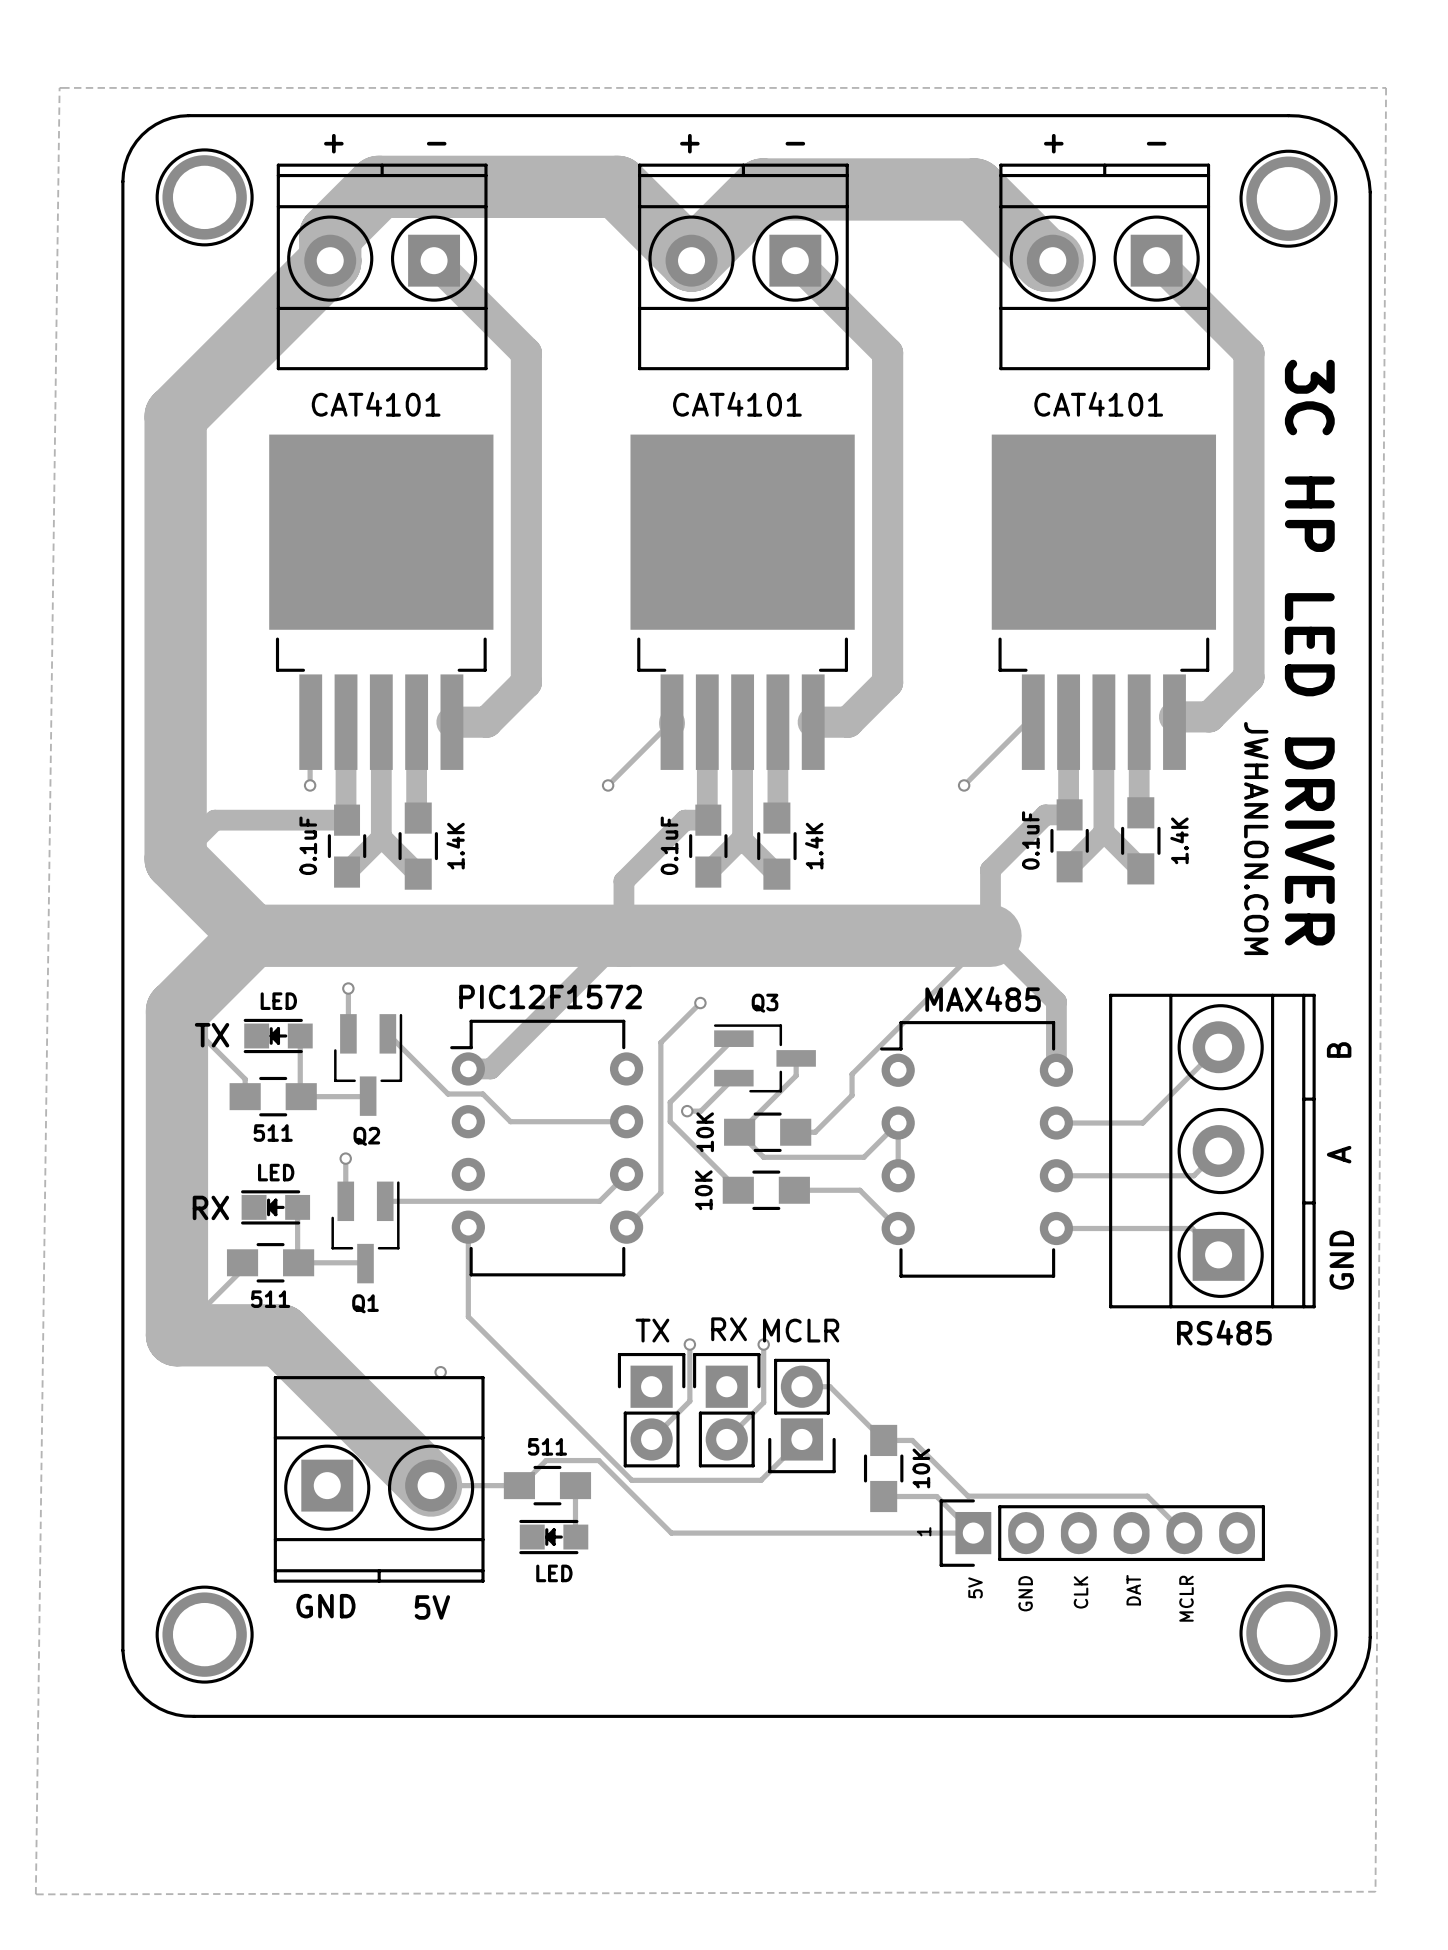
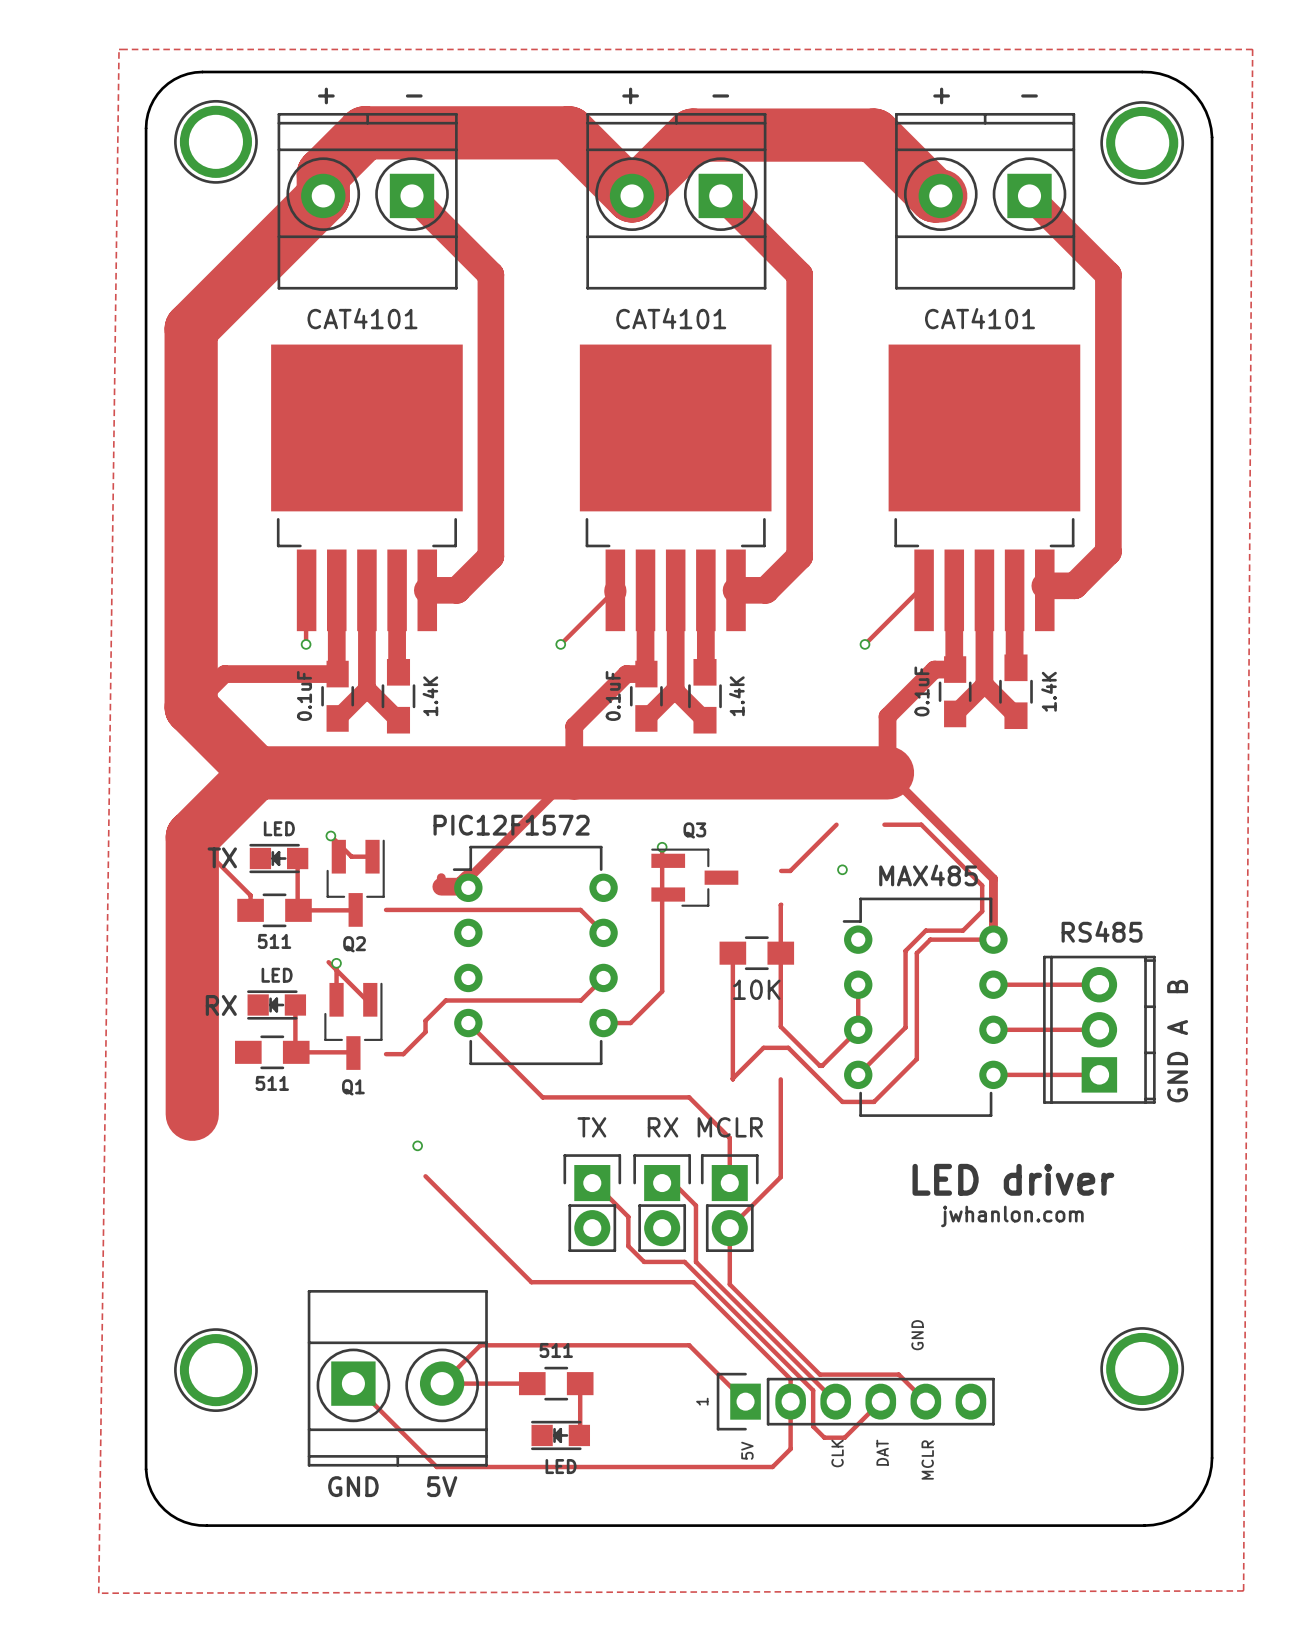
zone outline: (59, 87) (1386, 87) (1375, 1891) (35, 1894) (59, 87) -> (119, 49) (1252, 49) (1243, 1590) (98, 1593) (119, 49)
text: 3C HP LED DRIVER (1309, 652) -> none
text: JWHANLON.COM (1256, 838) -> none
track width: thick (623, 935) (499, 1059) -> thin (574, 772) (468, 878)
track: (990, 935) (852, 1074) (852, 1095) (815, 1132) (795, 1132) -> none
track width: thick (990, 935) (1056, 1001) -> thin (887, 772) (943, 829)
track: (348, 988) (348, 1027) -> none
via position: (348, 988) -> (330, 835)
track: none -> (836, 824) (790, 870) (781, 870)
track: none -> (884, 824) (921, 824) (982, 885) (982, 911) (962, 930) (925, 930) (905, 950) (905, 1027) (858, 1074)
text position: MAX485 (983, 999) -> MAX485 (928, 875)
track: (1056, 1001) (1056, 1070) -> (943, 829) (993, 878) (993, 939) (930, 939) (916, 953) (916, 1059) (874, 1101) (842, 1101) (788, 1047) (763, 1047) (732, 1078)
track: (700, 1003) (660, 1042) (660, 1192) (626, 1227) -> none
via position: (700, 1003) -> (662, 847)
track: none -> (330, 835) (351, 856) (369, 856)
track: none -> (662, 847) (662, 991) (630, 1023) (603, 1023)
track: (387, 1033) (448, 1094) (482, 1094) (510, 1121) (626, 1121) -> none
track: (733, 1038) (670, 1102) (670, 1121) (738, 1190) -> none
track: (1218, 1047) (1142, 1123) (1056, 1123) -> none
via: none -> (842, 869)
text position: B (1339, 1050) -> B (1177, 986)
track: (795, 1058) (796, 1075) (739, 1133) (763, 1157) (863, 1157) (898, 1123) (898, 1175) -> none
track: (733, 1080) (733, 1078) (700, 1111) (687, 1111) -> none
track: none -> (781, 904) (780, 1026) (819, 1065) (822, 1065) (858, 1029) (858, 984)
track: none -> (386, 909) (580, 909) (603, 932)
via: (687, 1111) -> none
part: 10K (767, 1132) -> none
track: none -> (732, 953) (732, 1079)
part: none -> 10K (756, 953)
part position: (546, 1148) -> (535, 955)
part position: (976, 1149) -> (925, 1007)
part: (1212, 1151) -> none
track: (1218, 1151) (1193, 1175) (1056, 1175) -> none
text position: A (1339, 1154) -> A (1177, 1027)
track: none -> (328, 962) (367, 1000)
track: (626, 1174) (599, 1201) (385, 1201) -> none
track: none -> (603, 977) (581, 1000) (445, 1000) (425, 1020) (425, 1032) (403, 1054) (386, 1054)
track: none -> (993, 984) (1099, 984)
part: 10K (766, 1190) -> none
track: (794, 1190) (859, 1190) (898, 1228) -> none
track: (468, 1227) (468, 1316) (631, 1480) (761, 1480) (801, 1439) -> none
track: none -> (468, 1023) (542, 1097) (689, 1097) (729, 1137) (729, 1183)
track: (1056, 1228) (1192, 1228) (1218, 1254) -> none
track: none -> (993, 1029) (1099, 1029)
part: none -> (1099, 1029)
text position: GND (1341, 1260) -> GND (1177, 1077)
track: (242, 1269) (176, 1335) (280, 1335) (431, 1485) (521, 1485) (546, 1460) (598, 1460) (671, 1533) (973, 1533) (936, 1496) (883, 1496) -> none
track: none -> (993, 1074) (1099, 1074)
track: none -> (780, 1079) (780, 1177) (729, 1228) (729, 1284) (819, 1374) (898, 1374) (925, 1401)
part value position: RX (729, 1329) -> RX (663, 1127)
part value position: TX (652, 1330) -> TX (591, 1127)
text position: RS485 (1224, 1332) -> RS485 (1102, 931)
track: (689, 1344) (689, 1401) (651, 1439) -> none
via: (689, 1344) -> none
track: (763, 1344) (763, 1402) (726, 1439) -> none
via: (763, 1344) -> none
track: (801, 1386) (829, 1386) (883, 1440) (912, 1440) (968, 1496) (1147, 1496) (1184, 1533) -> none
track: none -> (425, 1176) (531, 1282) (693, 1282) (790, 1379) (790, 1448) (772, 1467) (436, 1467) (353, 1383)
part position: (651, 1410) -> (592, 1203)
part position: (726, 1410) -> (662, 1203)
text: none -> LED driver (1013, 1179)
track: none -> (594, 1183) (628, 1216) (628, 1246) (644, 1261) (684, 1261) (813, 1390) (813, 1426) (824, 1437) (844, 1437) (880, 1401)
track: none -> (662, 1183) (673, 1183) (695, 1205) (695, 1261) (835, 1401)
part rotation: 0° (801, 1416) -> 180° (729, 1203)
text: none -> jwhanlon.com (1012, 1216)
part: 10K (883, 1468) -> none
part position: (379, 1479) -> (397, 1378)
part position: (547, 1485) -> (556, 1383)
track: (575, 1485) (575, 1537) -> none
text position: 1 (924, 1531) -> 1 (702, 1401)
part position: (1102, 1533) -> (855, 1401)
part position: (553, 1537) -> (560, 1435)
text position: 5V (975, 1587) -> 5V (747, 1450)
text position: DAT (1133, 1590) -> DAT (882, 1452)
text position: CLK (1081, 1592) -> CLK (837, 1453)
text position: MCLR (1186, 1598) -> MCLR (927, 1459)
text position: GND (325, 1606) -> GND (353, 1486)
text position: 5V (432, 1607) -> 5V (442, 1486)
board edge: (1370, 1637) (1364, 1667) (1347, 1693) (1321, 1710) (1291, 1716) (185, 1716) (159, 1708) (144, 1698) (129, 1676) (122, 1650) -> (1212, 1372) (1212, 1457) (1206, 1483) (1198, 1499) (1185, 1511) (1170, 1520) (1153, 1525) (199, 1525) (177, 1518) (159, 1504) (151, 1491) (146, 1469)
board edge: none -> (146, 1383) (146, 1469)
track: none -> (442, 1383) (534, 1383)
track: none -> (442, 1383) (480, 1345) (689, 1345) (745, 1401)
track: none -> (580, 1383) (579, 1435)

